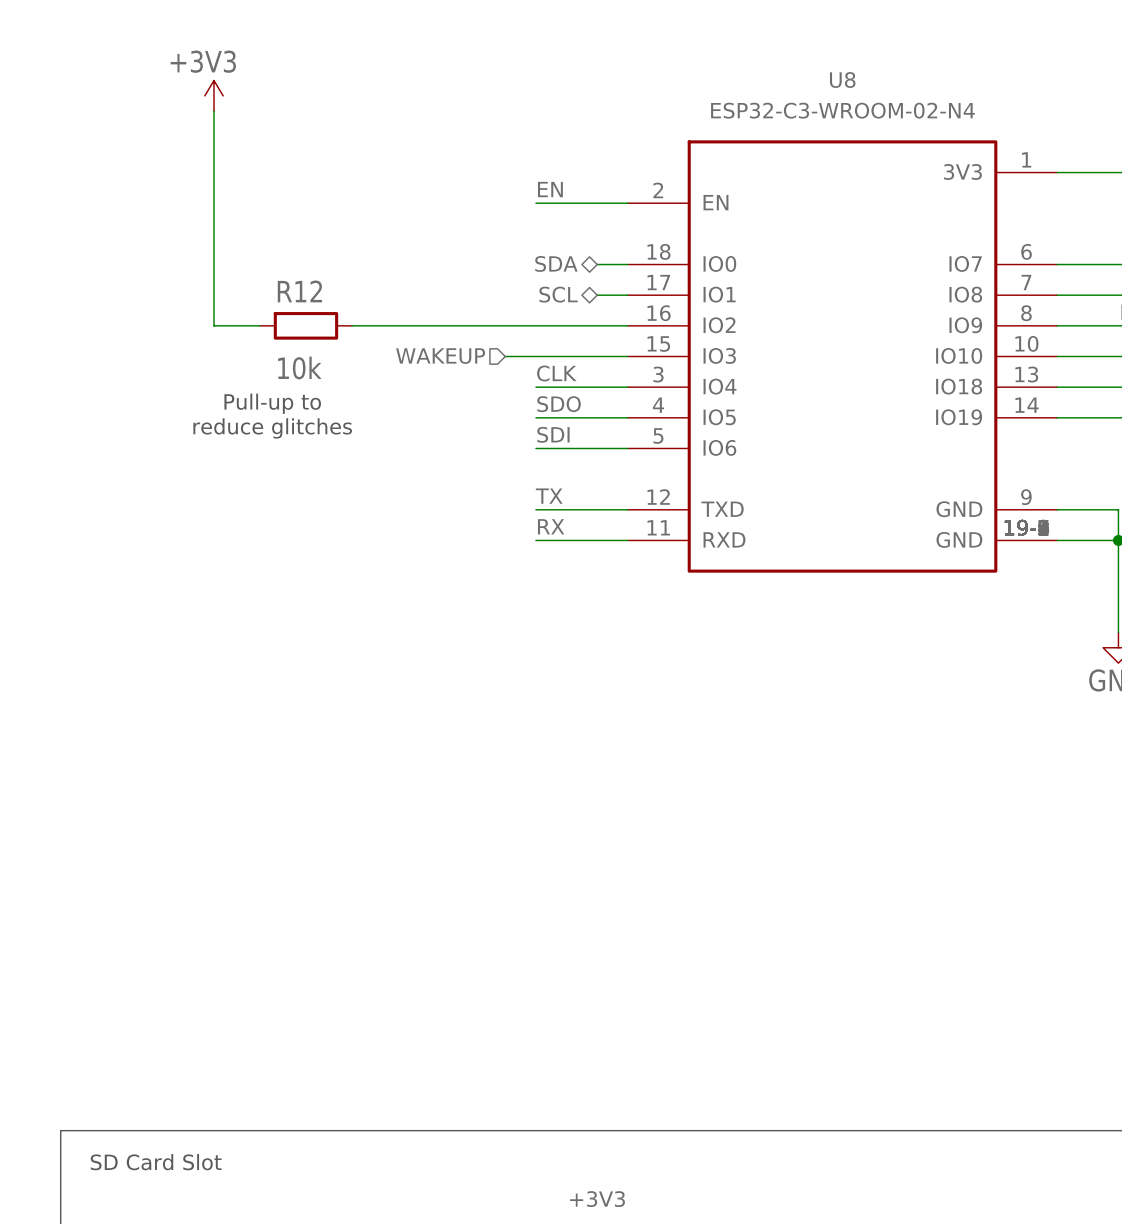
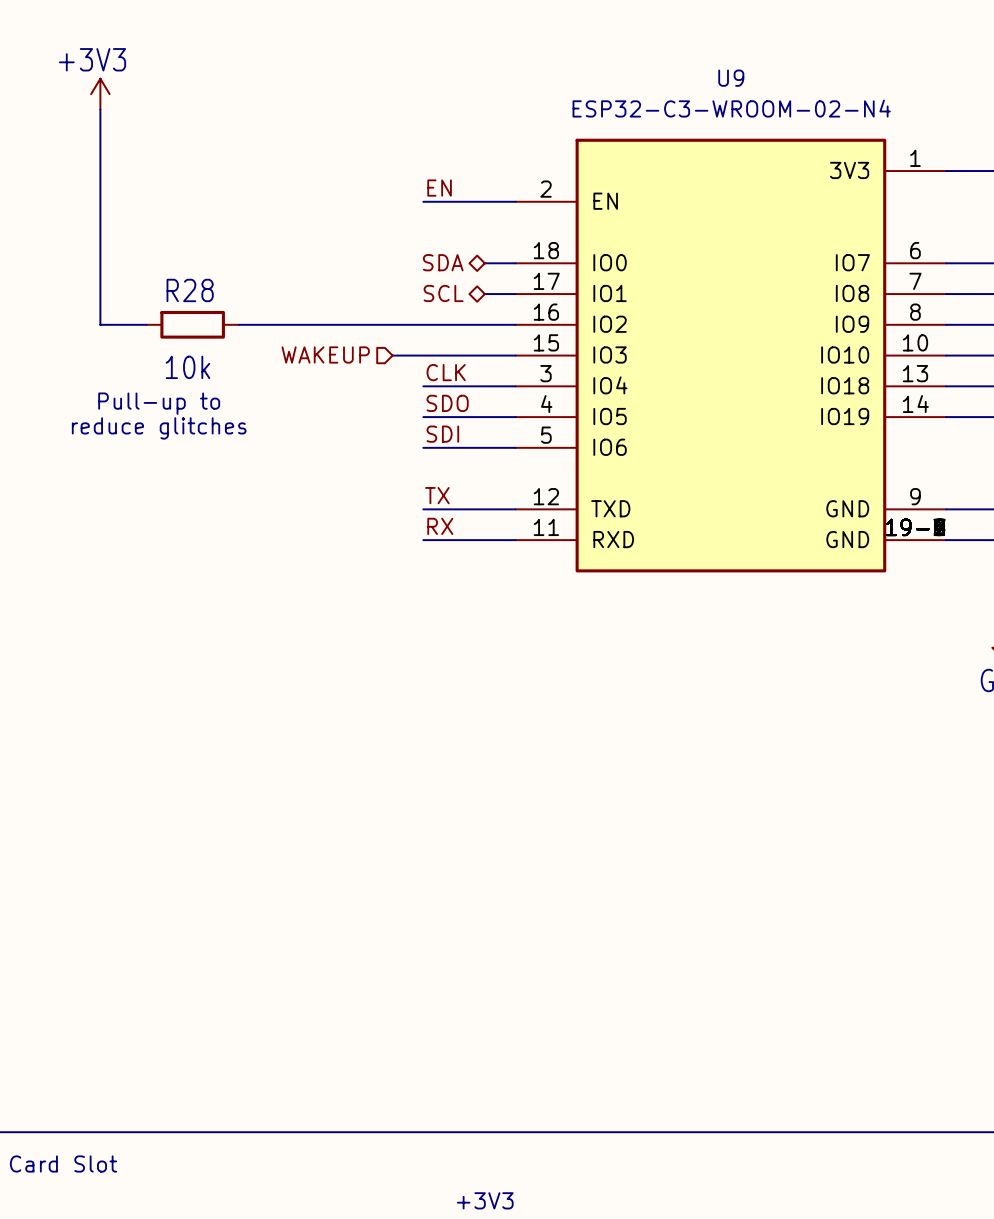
U8 name: U8 (842, 80) -> U9 (731, 78)
R12 name: R12 (299, 291) -> R28 (190, 290)

